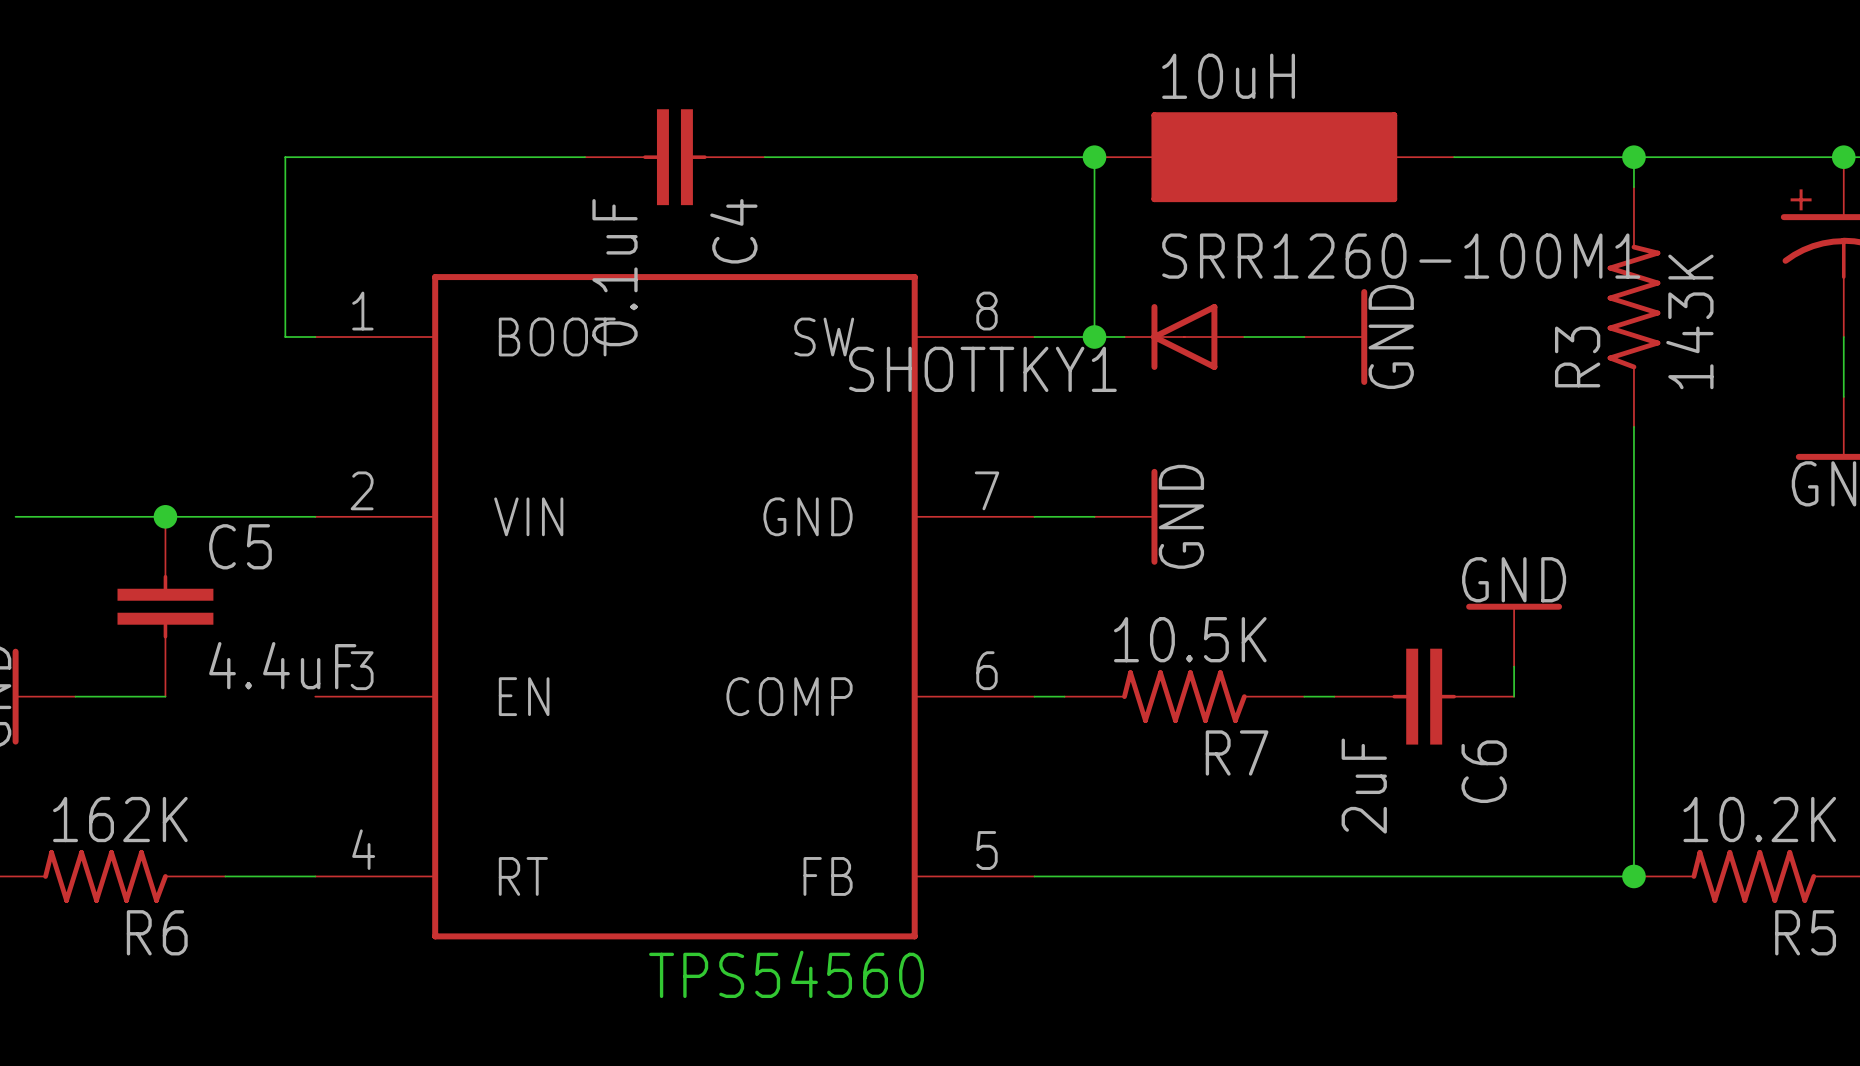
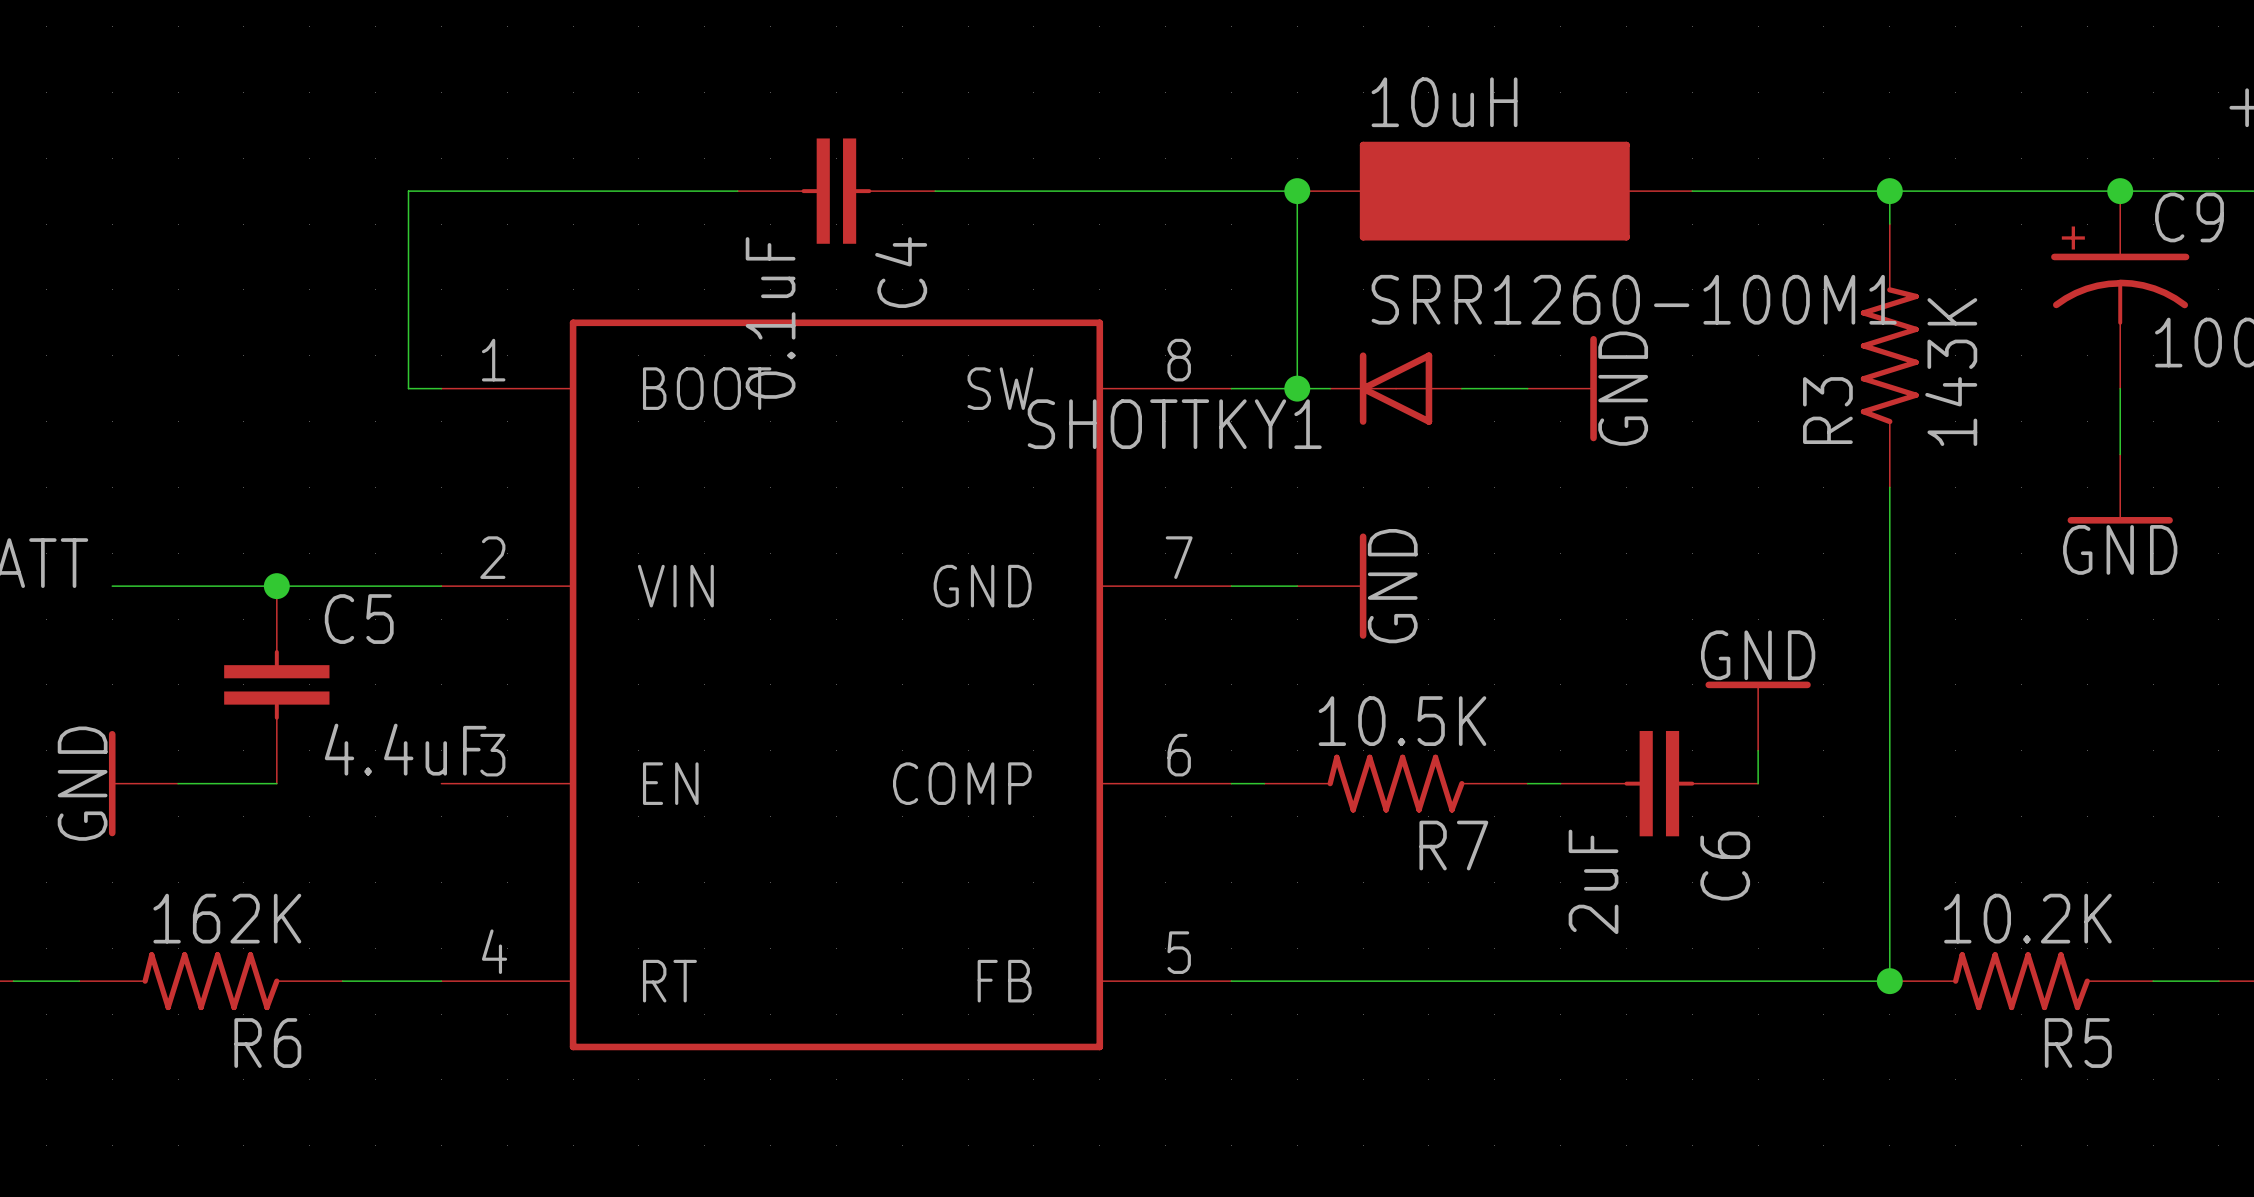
text: TPS54560 (786, 974) -> none

